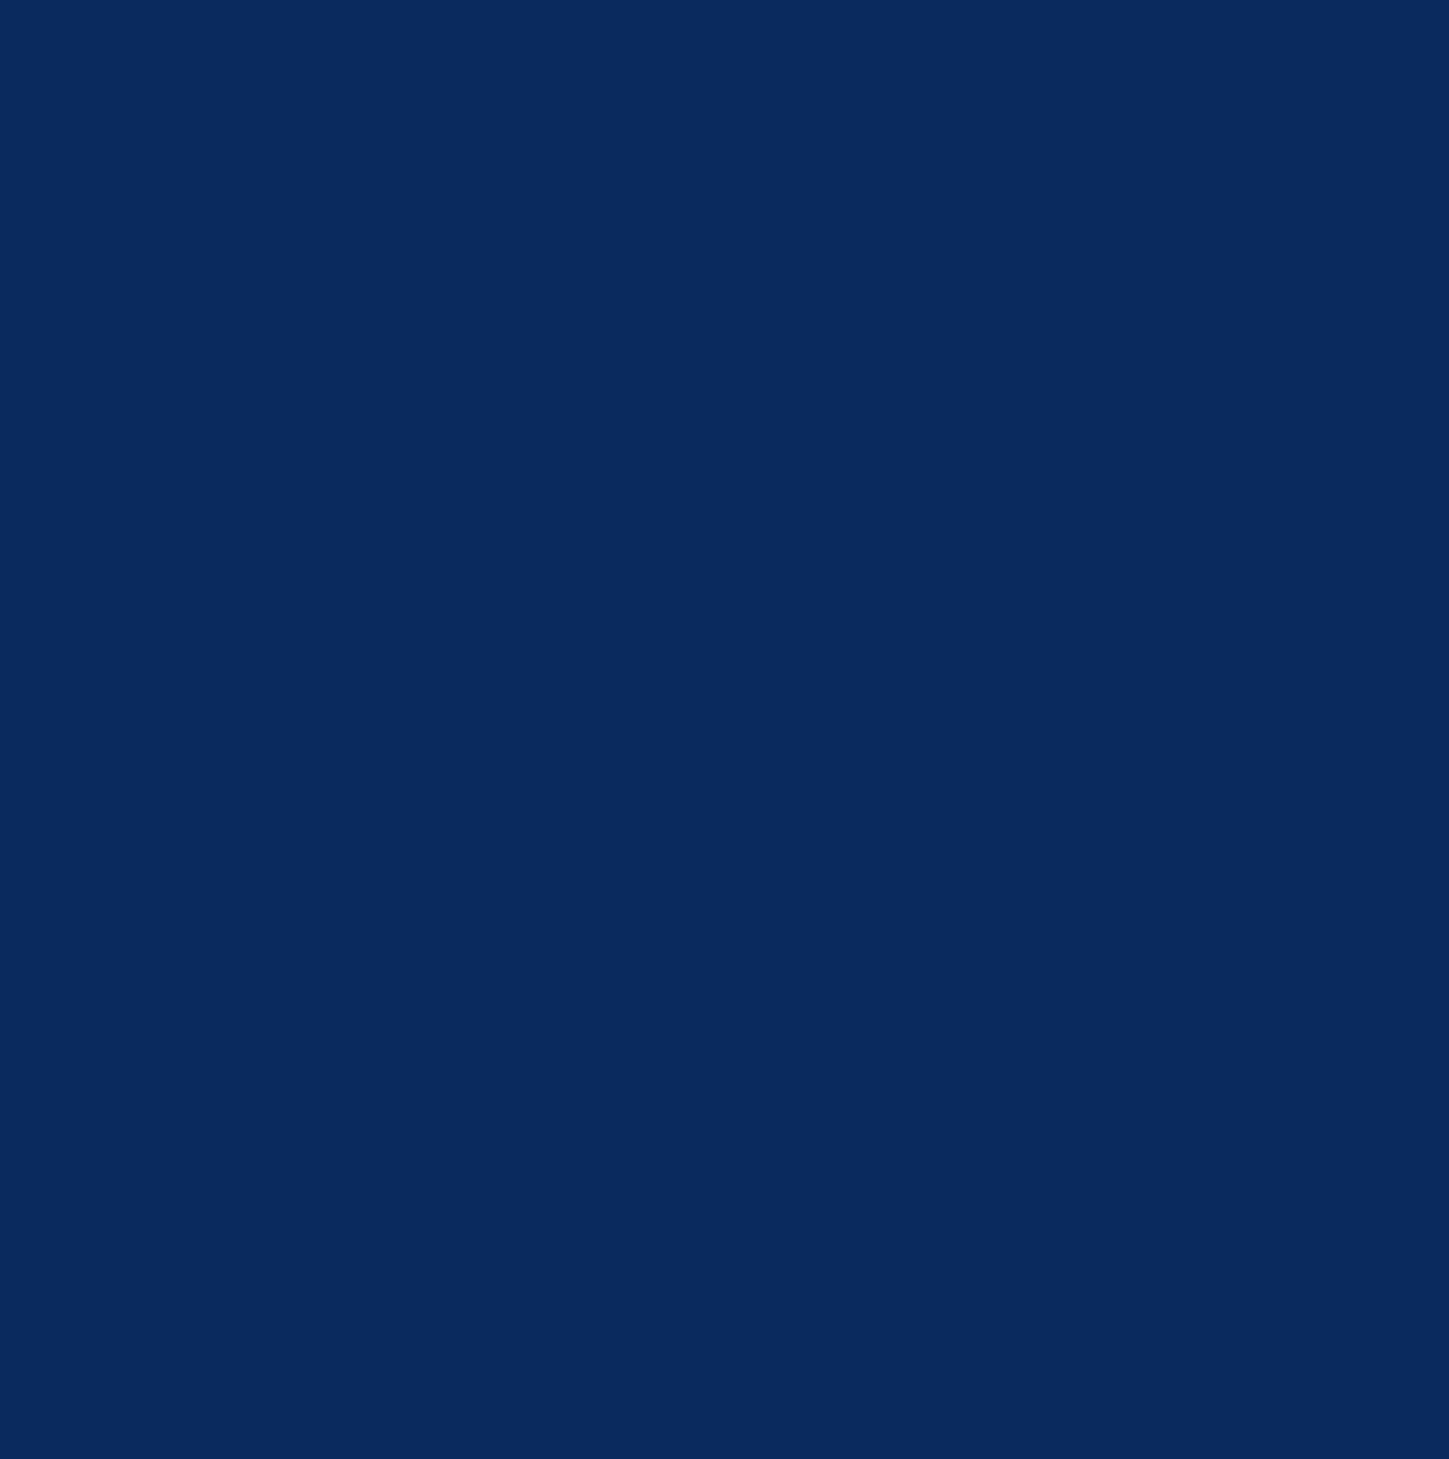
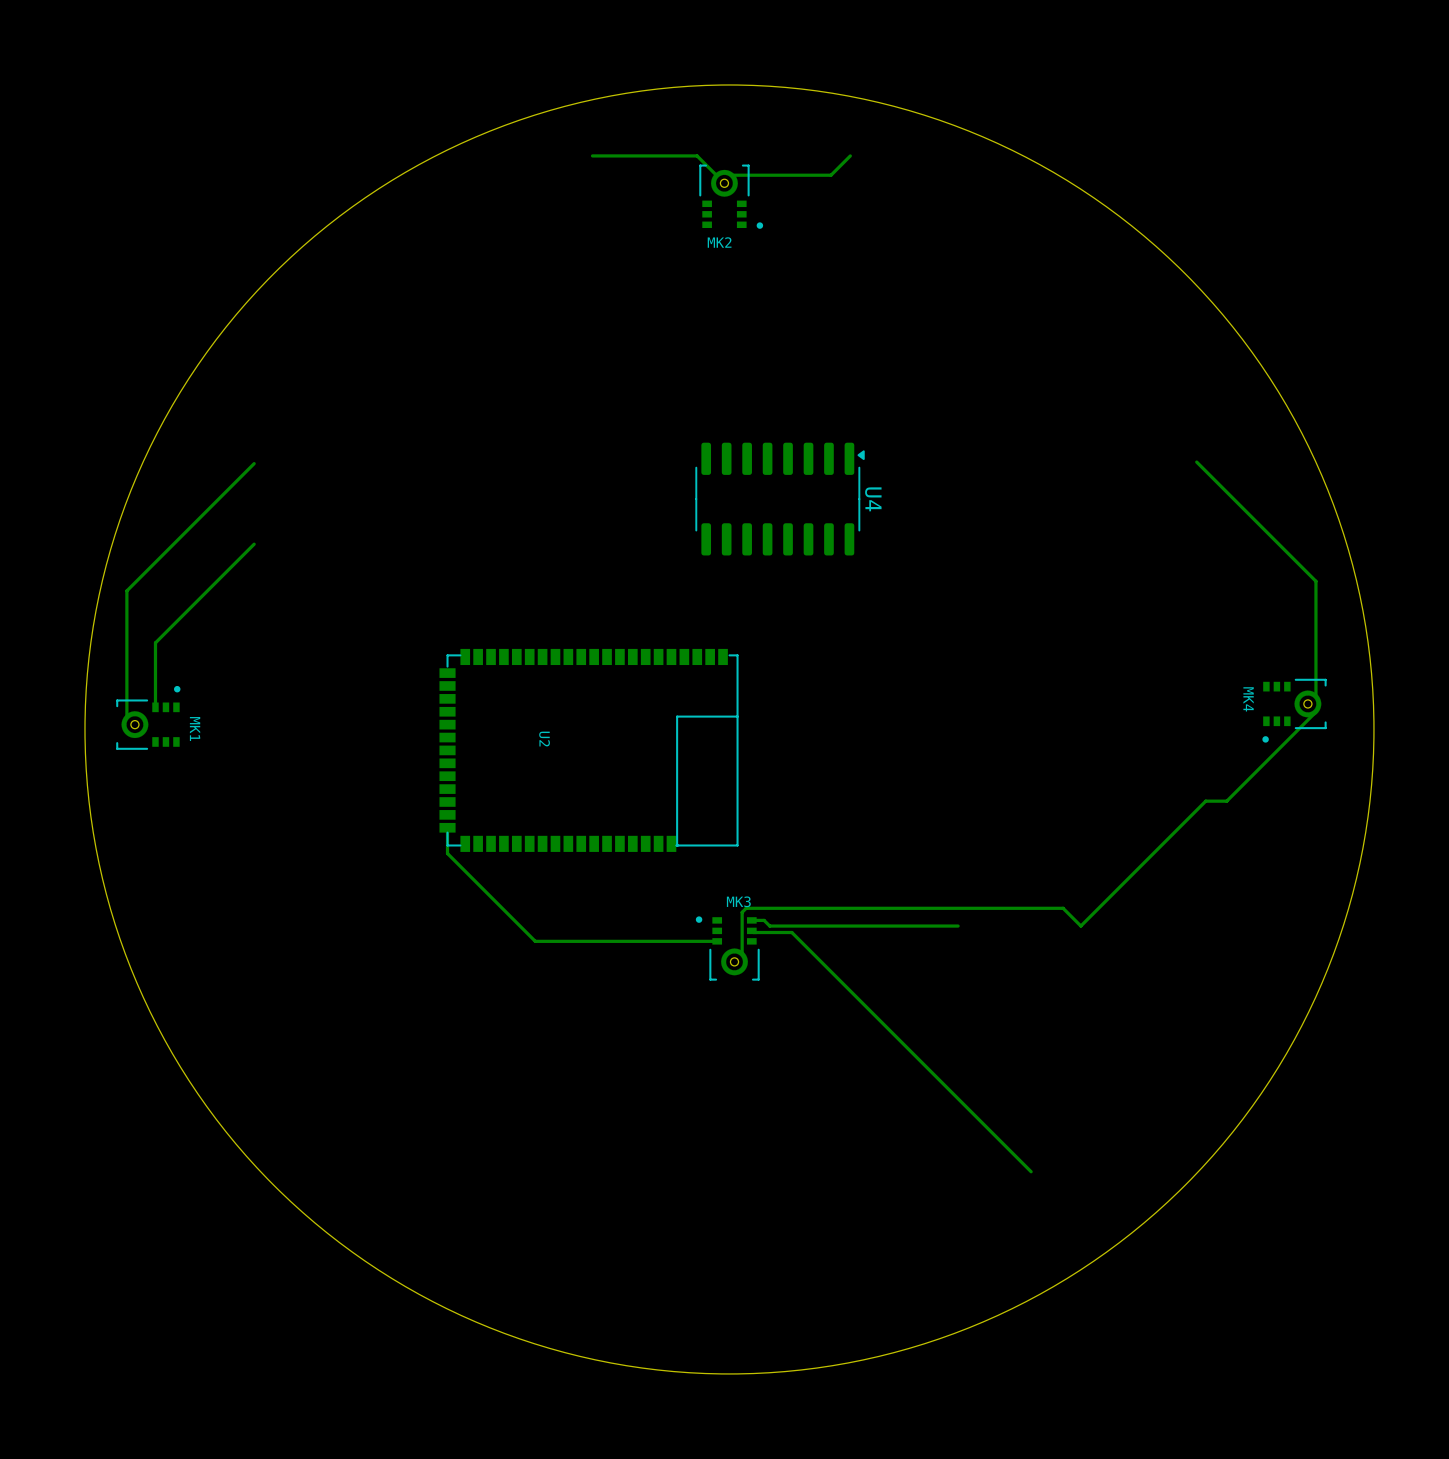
round board edge: none -> [84, 84, 1375, 1375]
track: none -> (592, 155) (697, 155) (716, 175)
track: none -> (850, 155) (831, 175) (732, 175)
MK2: none -> (731, 196)
track: none -> (1196, 462) (1315, 581) (1315, 695)
track: none -> (254, 463) (126, 590) (126, 716)
U4: none -> (780, 499)
track: none -> (254, 544) (155, 642) (155, 707)
MK4: none -> (1294, 710)
track: none -> (1315, 712) (1226, 801) (1205, 801) (1080, 926) (1063, 908) (746, 908) (742, 912) (742, 953)
MK1: none -> (148, 717)
U2: none -> (589, 750)
track: none -> (447, 827) (447, 853) (535, 941) (717, 941)
track: none -> (751, 920) (764, 920) (769, 926) (958, 926)
track: none -> (751, 930) (753, 932) (791, 932) (1031, 1171)
MK3: none -> (727, 948)

